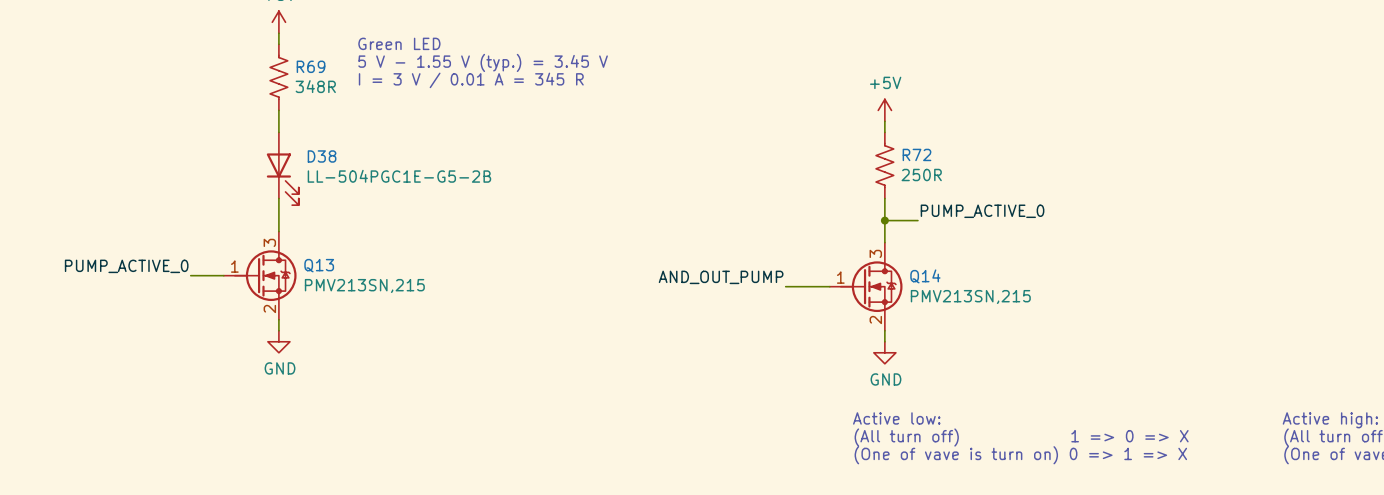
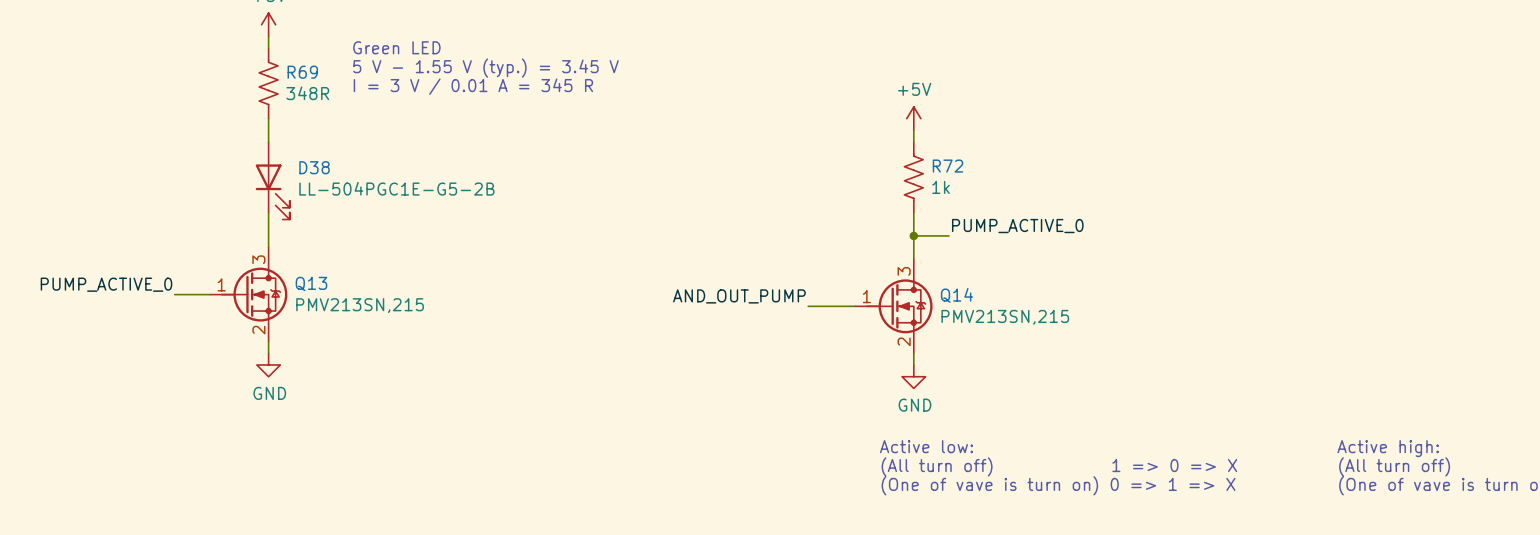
R72 value: 250R (921, 175) -> 1k (941, 187)

